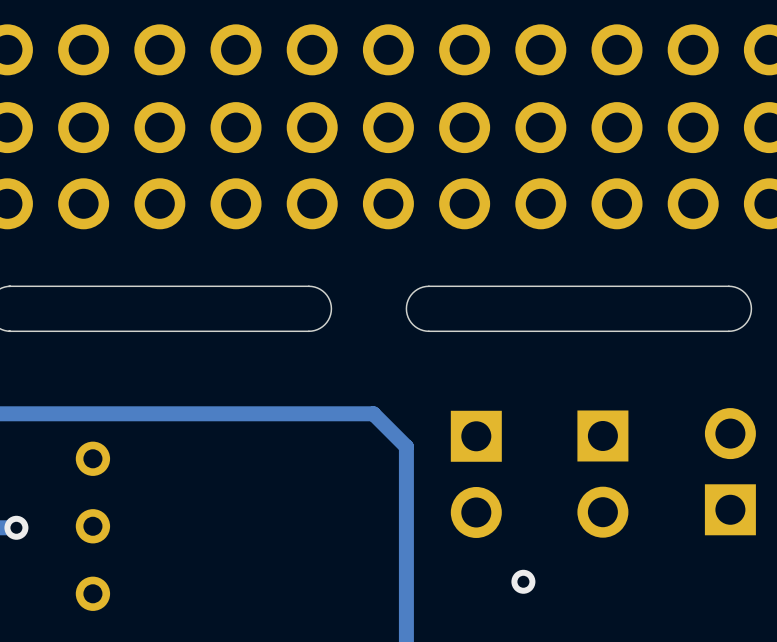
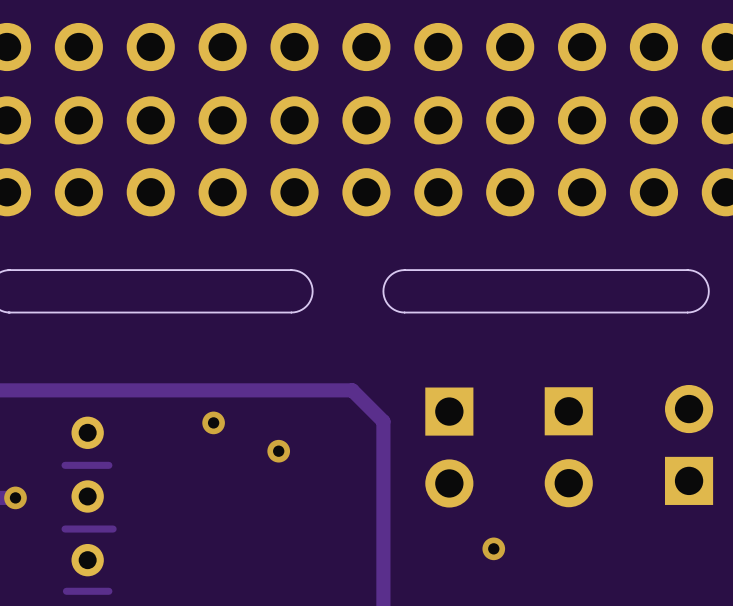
via: none -> (213, 422)
via: none -> (278, 451)
track: none -> (108, 465) (65, 465)
track: none -> (113, 529) (65, 529)
track: none -> (108, 591) (66, 591)

